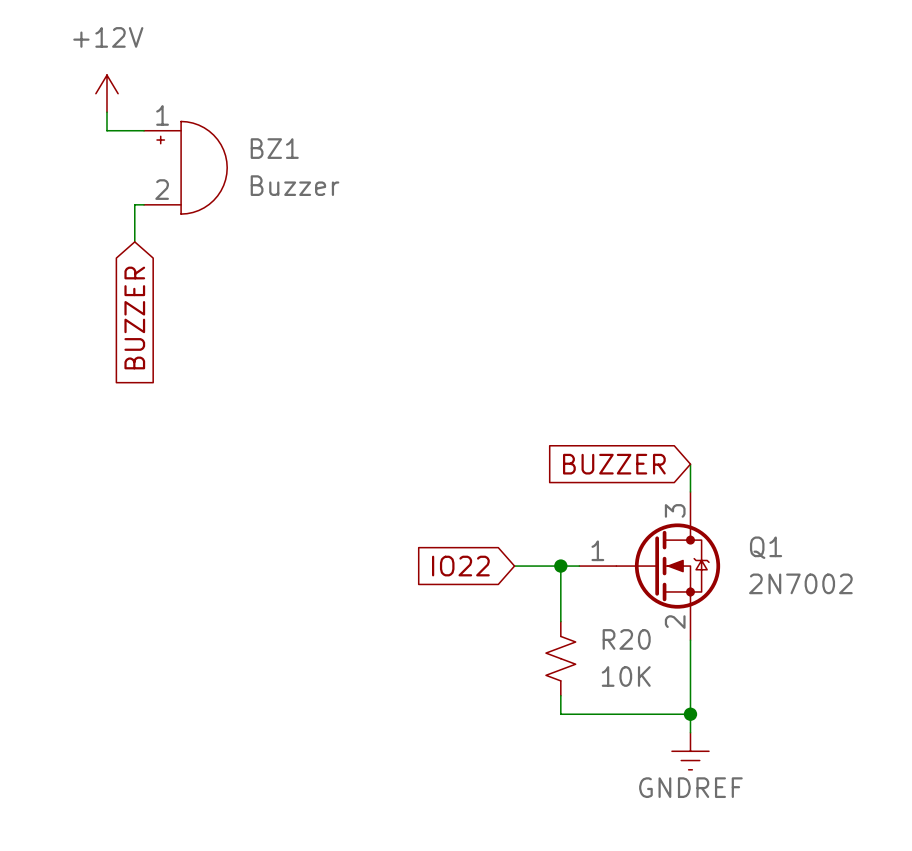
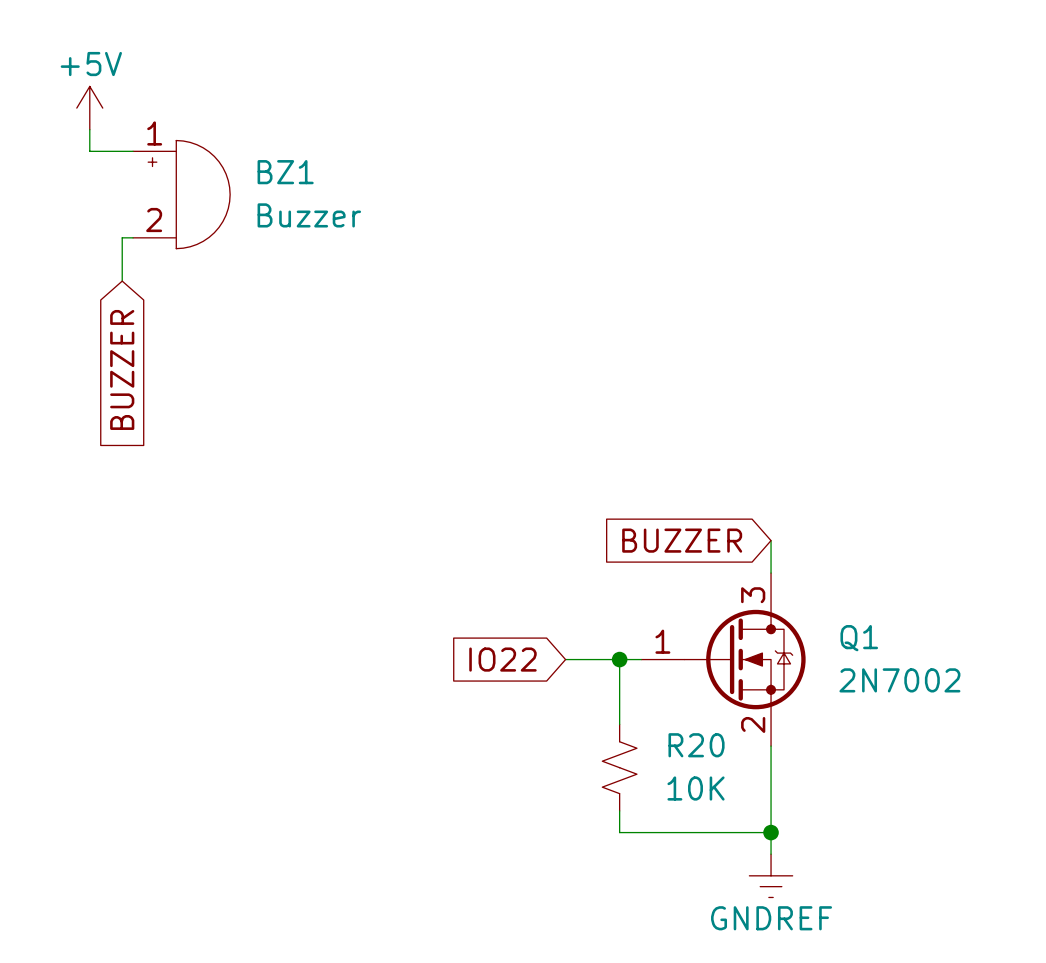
power symbol: +12V (106, 93) -> +5V (89, 108)

